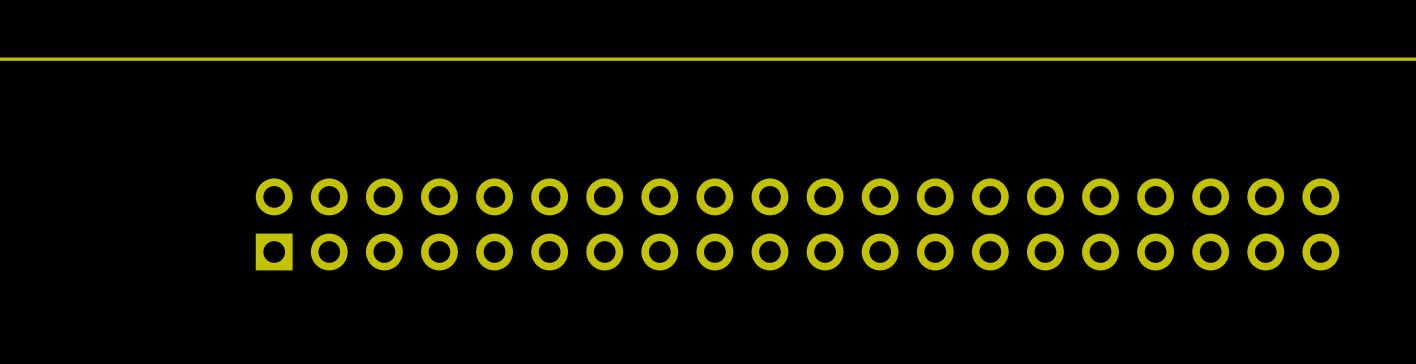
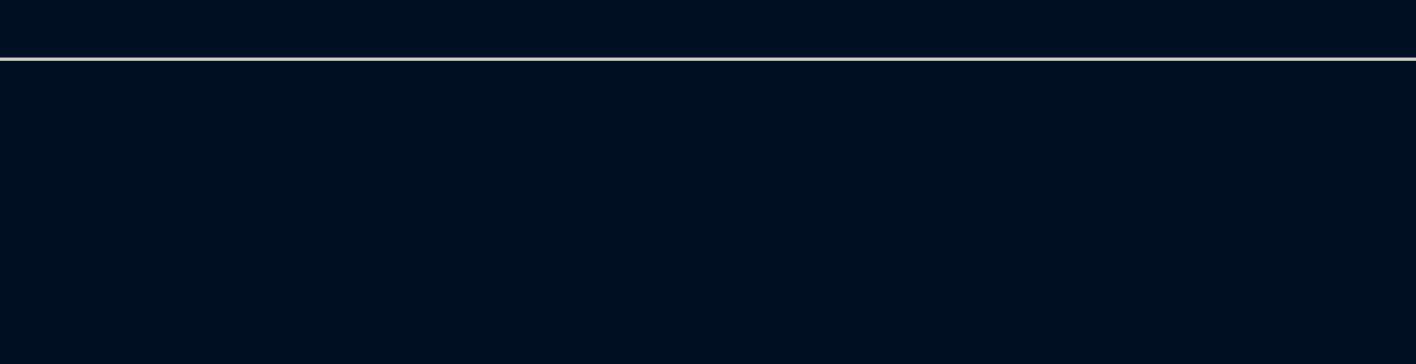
part: (797, 224) -> none

